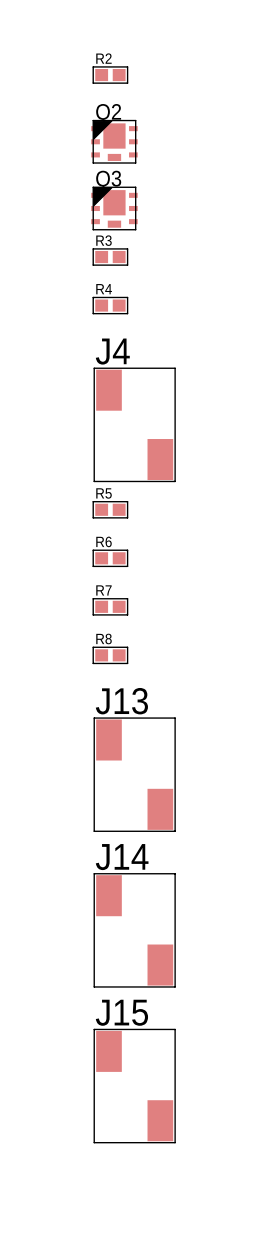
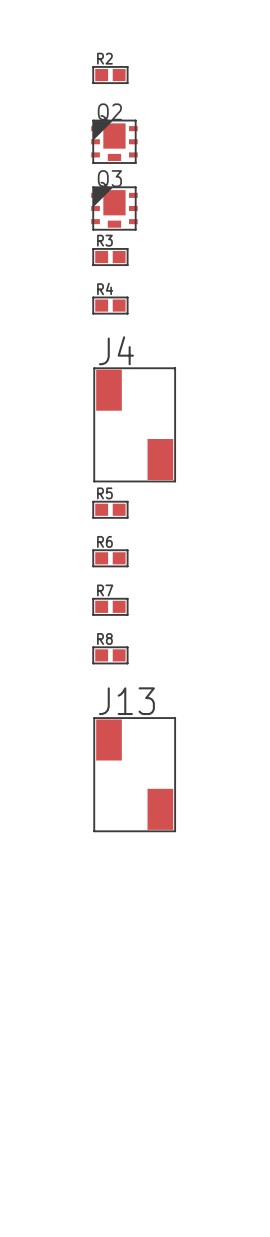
J14: (134, 930) -> none
J15: (134, 1086) -> none

